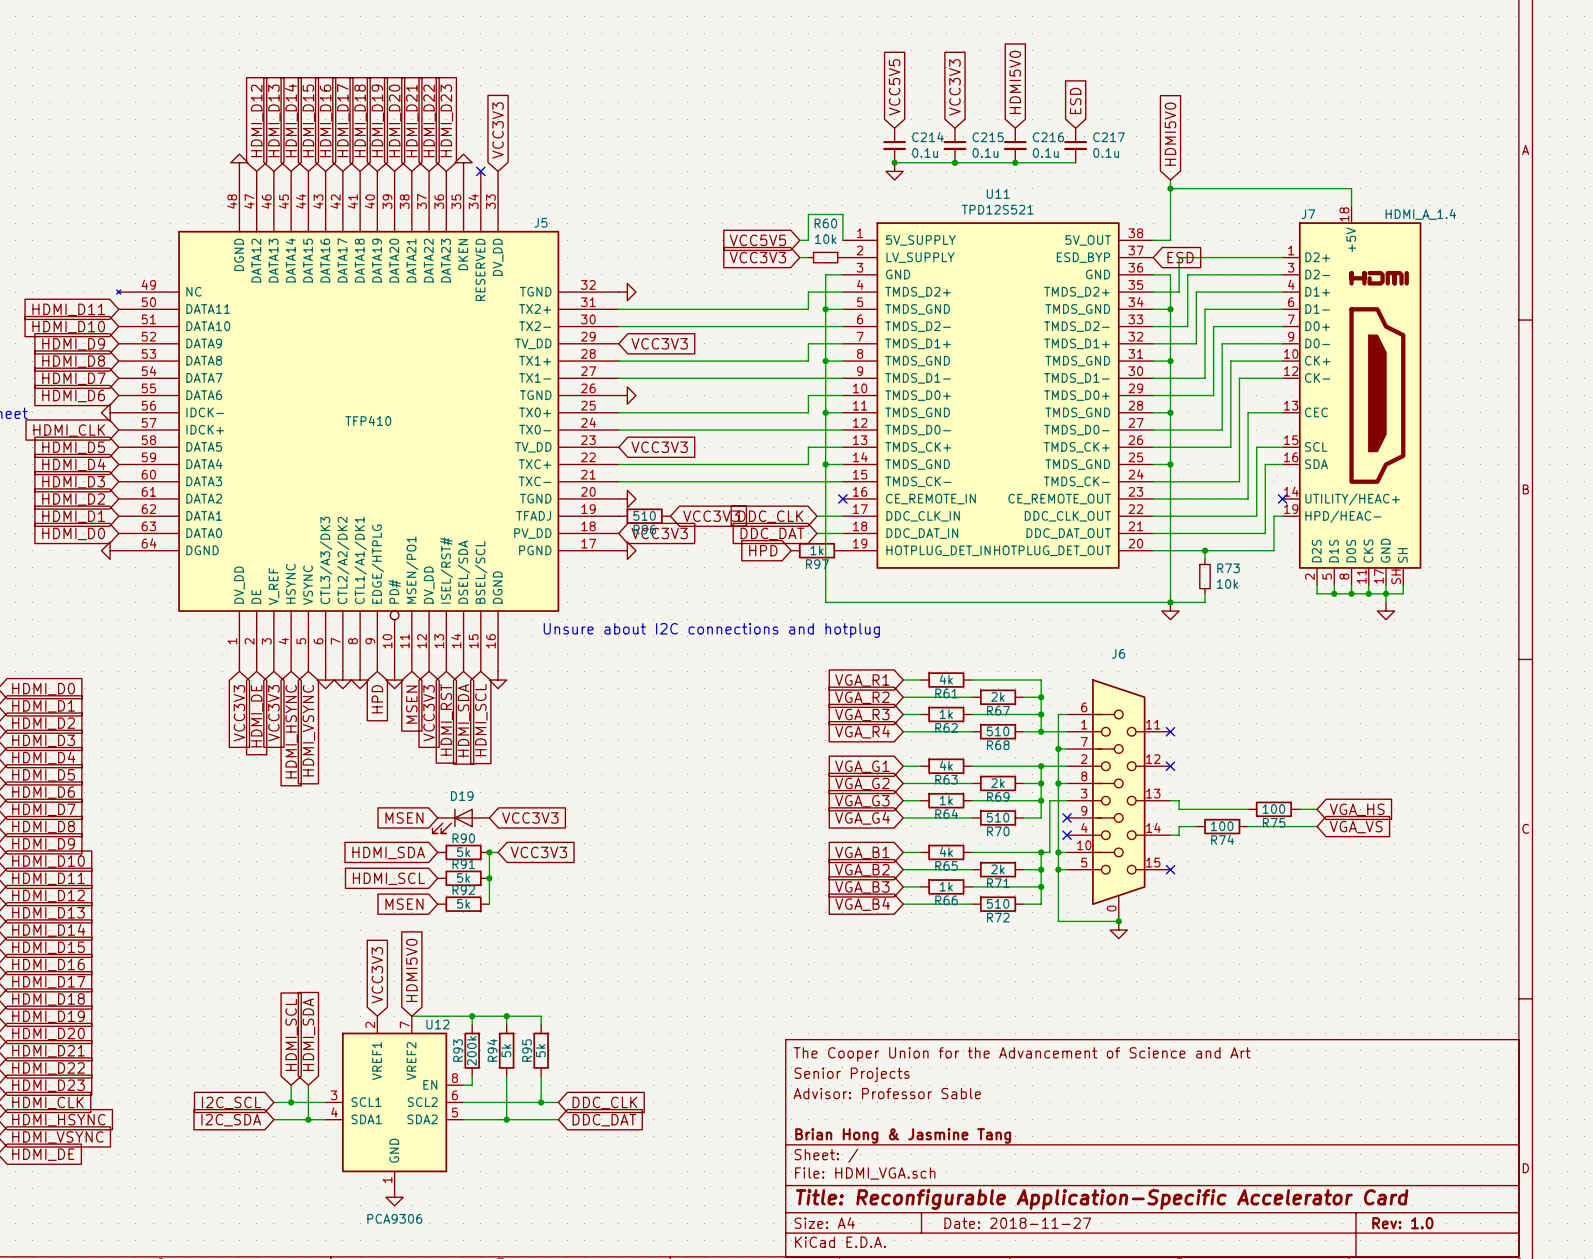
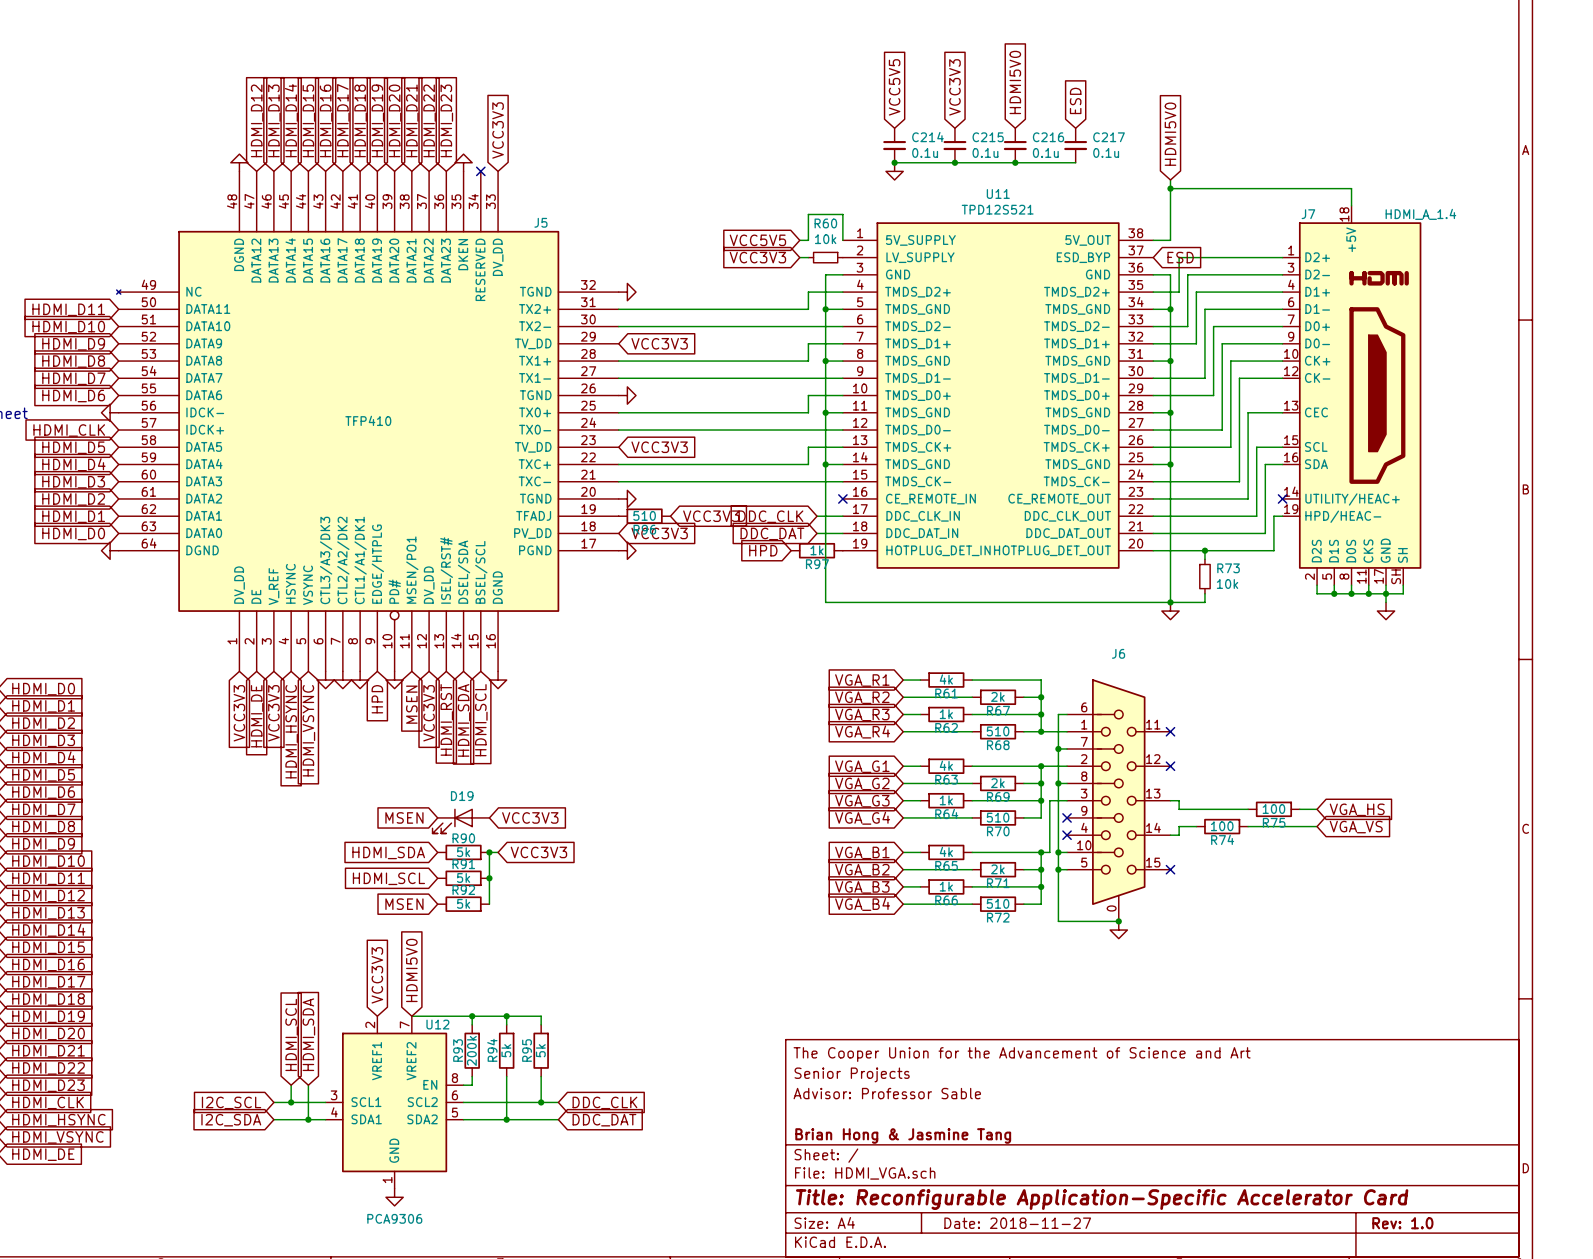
text: Unsure about I2C connections and hotplug (711, 630) -> none

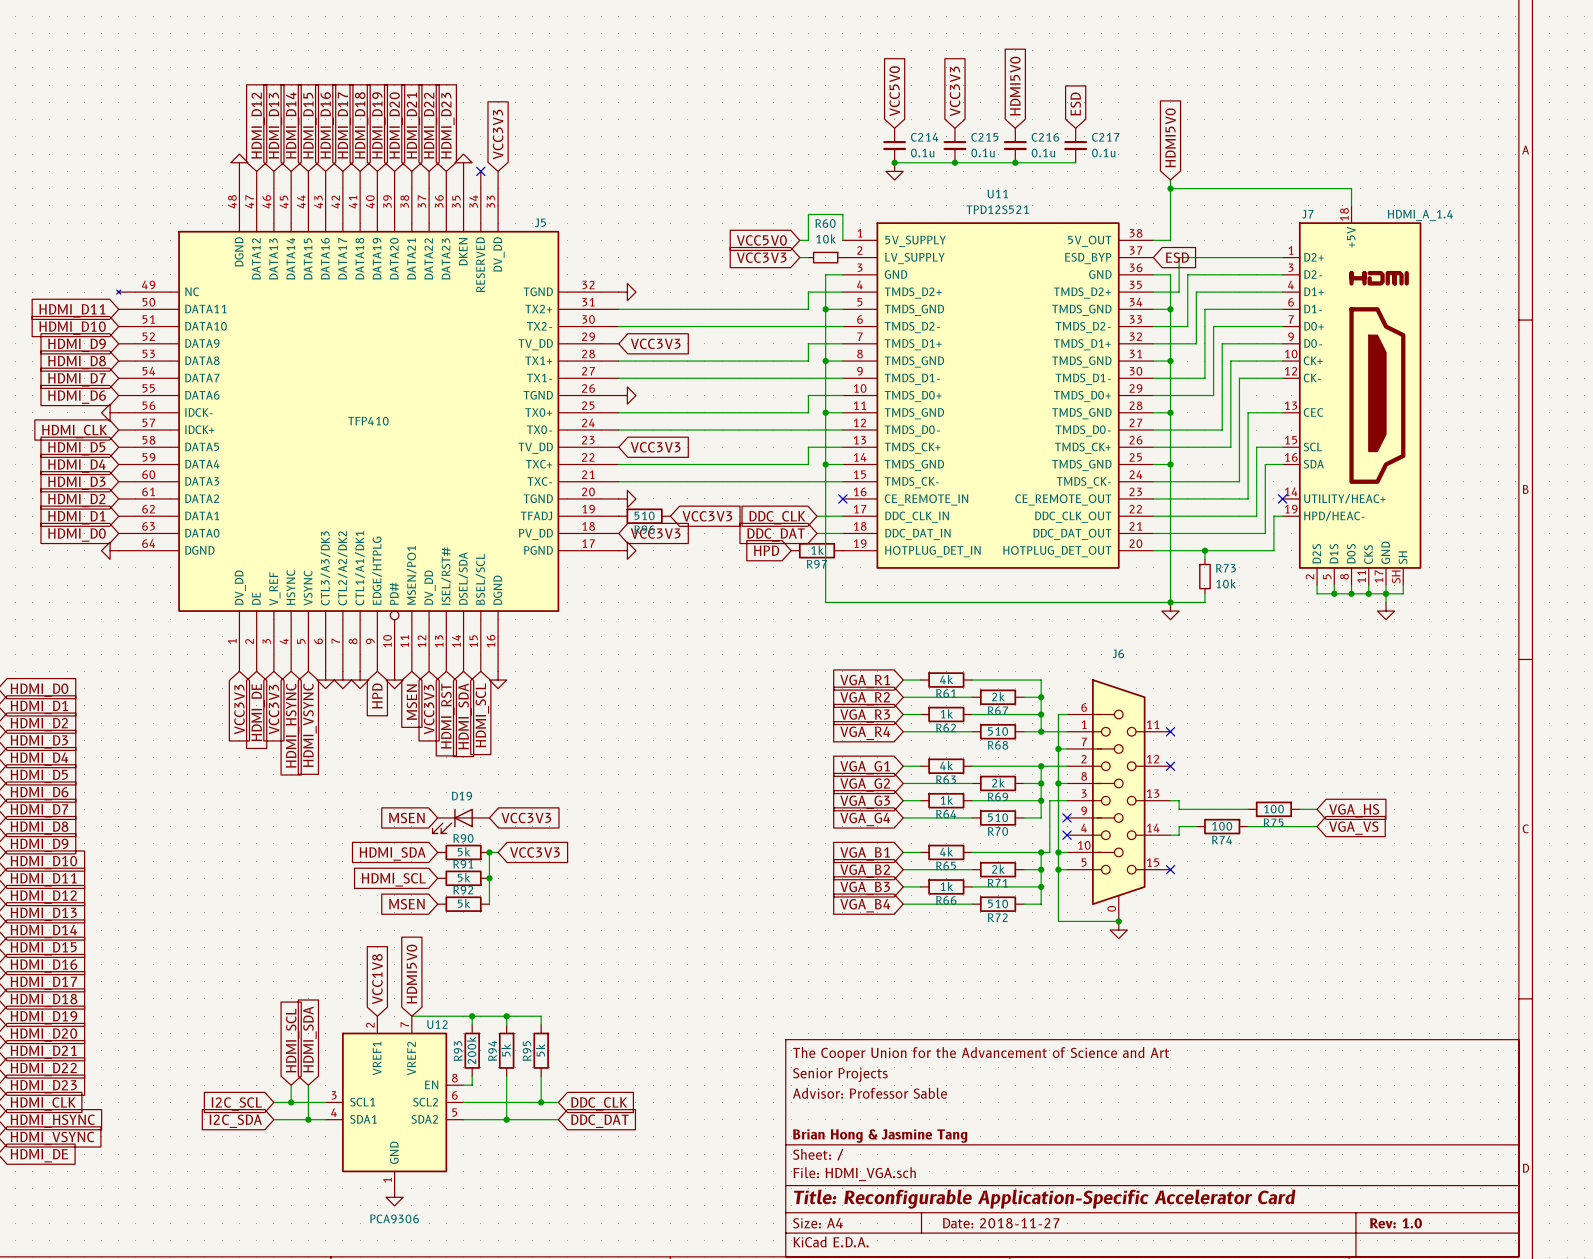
global label: VCC5V5 (894, 87) -> VCC5V0 (894, 91)
global label: VCC5V5 (757, 240) -> VCC5V0 (761, 240)
global label: VCC3V3 (377, 975) -> VCC1V8 (377, 979)

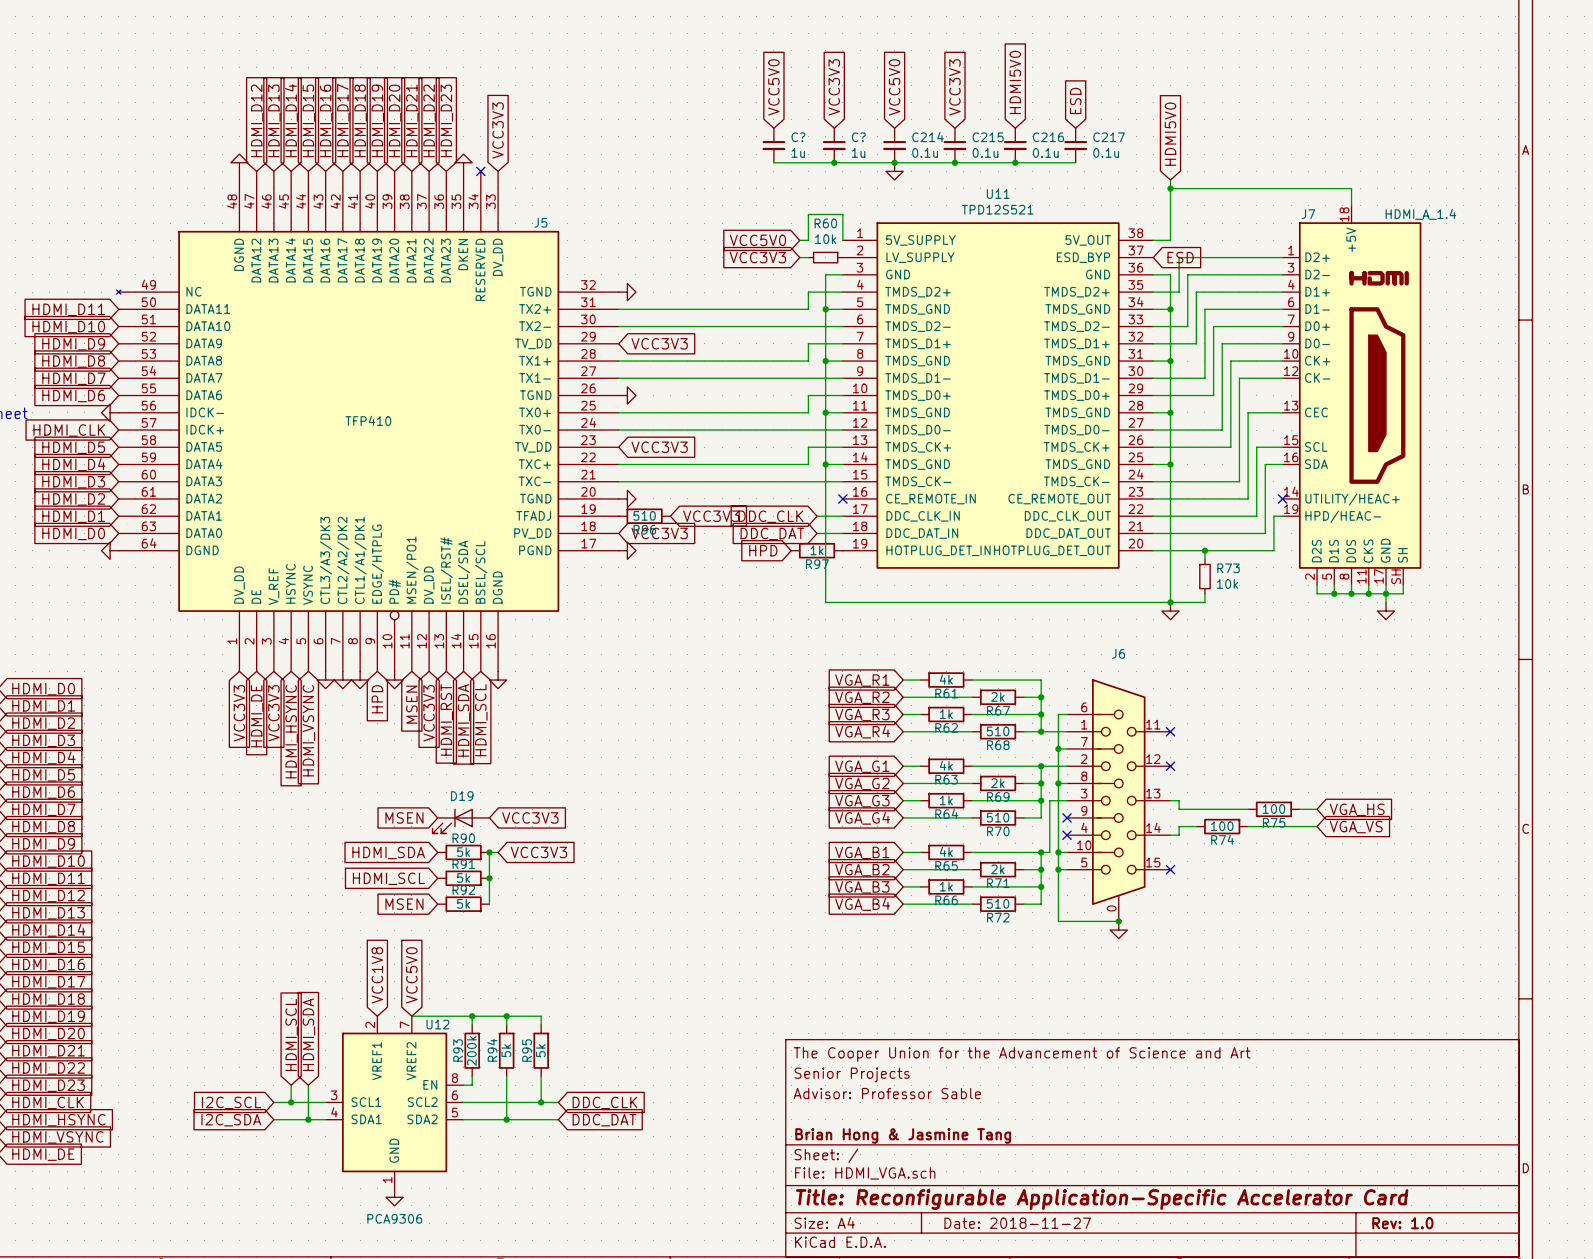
global label: none -> VCC5V0 (773, 87)
global label: none -> VCC3V3 (834, 87)
C?: none -> 1u (773, 145)
C?: none -> 1u (834, 145)
wire: none -> (773, 162) (894, 162)
junction: none -> (834, 162)
global label: HDMI5V0 (411, 974) -> VCC5V0 (411, 975)

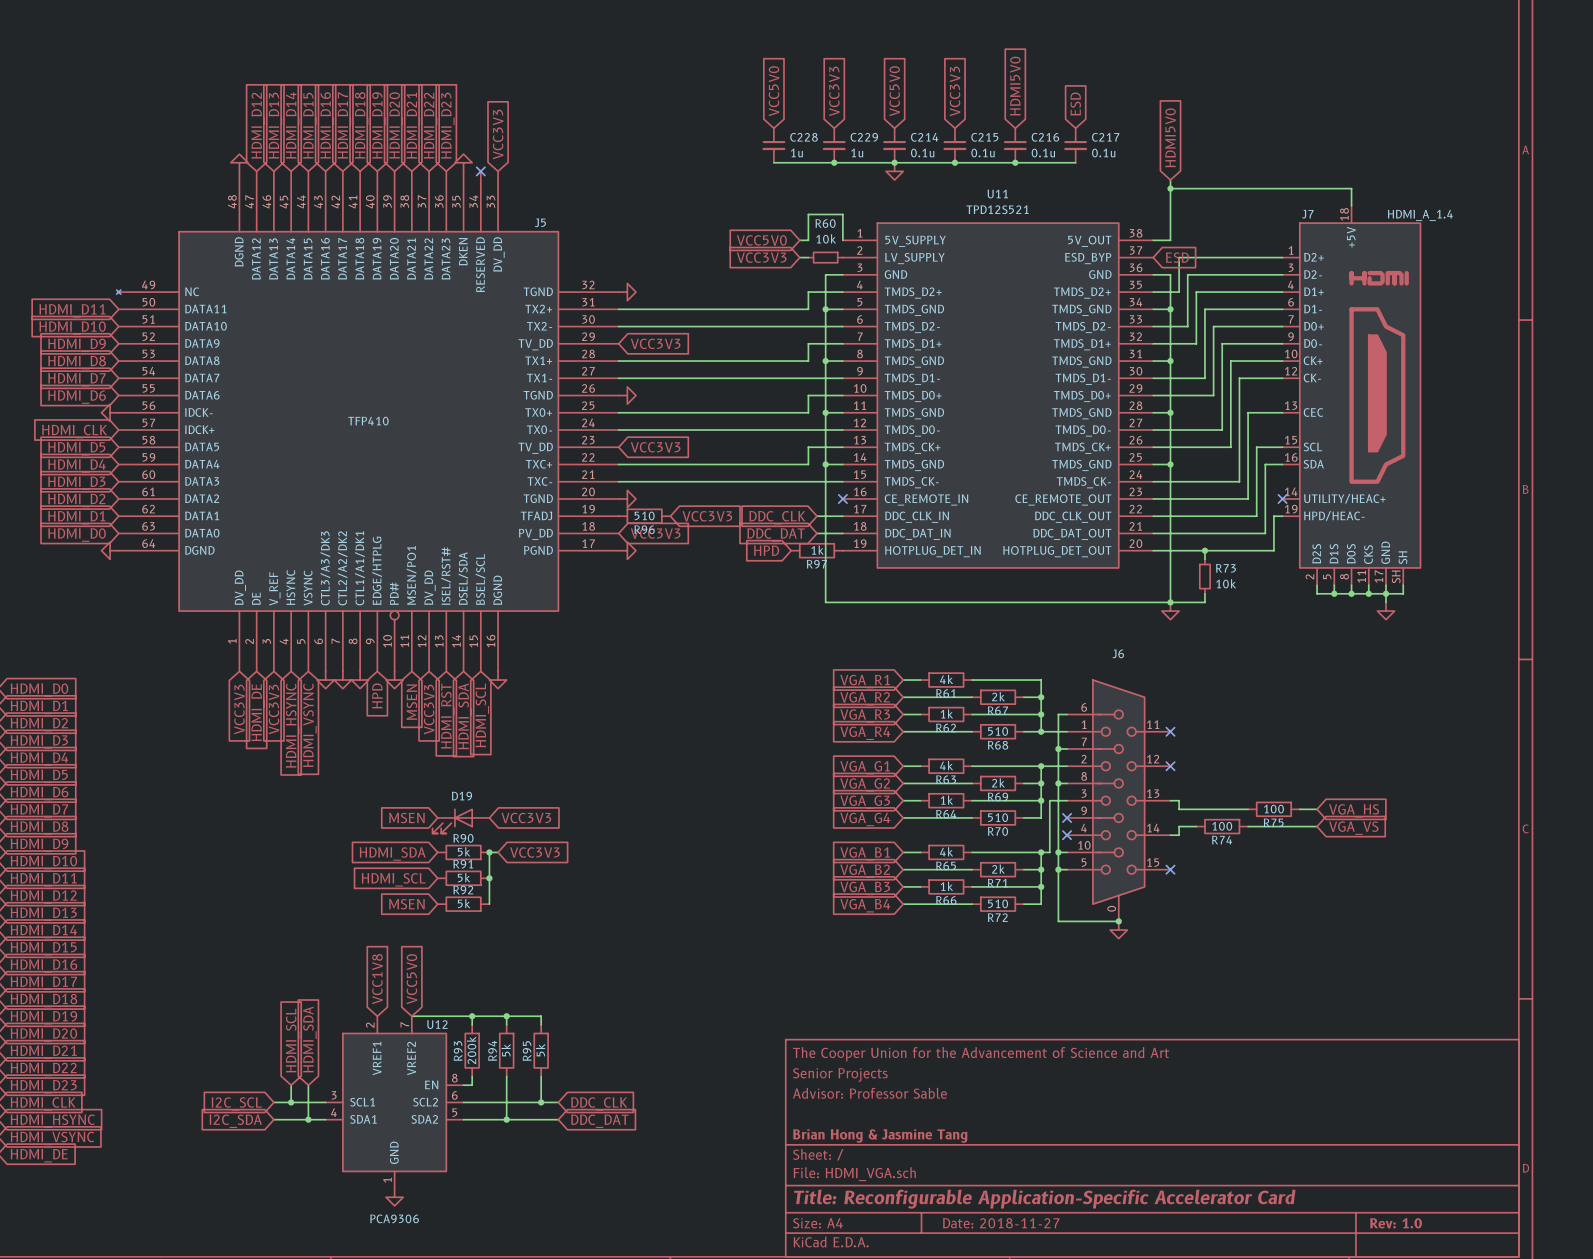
C? name: C? (798, 137) -> C228 (804, 137)
C? name: C? (858, 137) -> C229 (864, 137)

